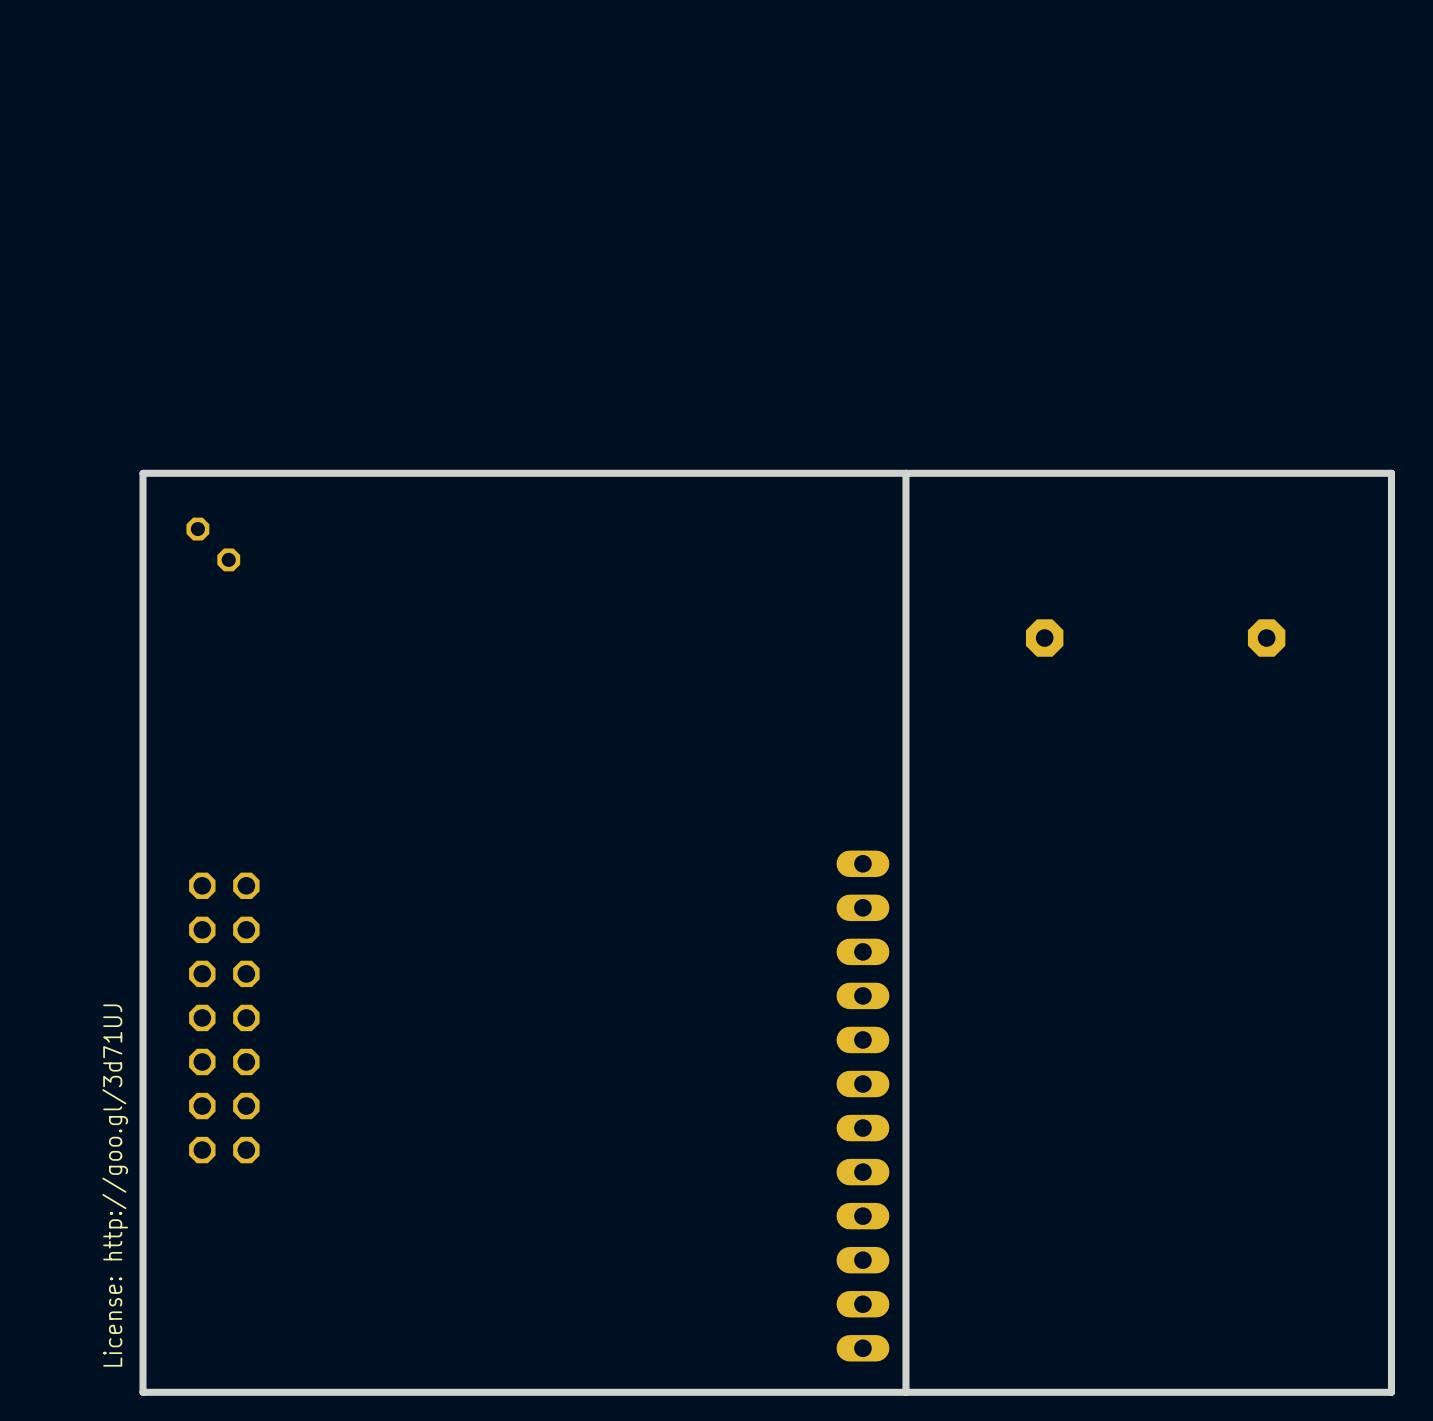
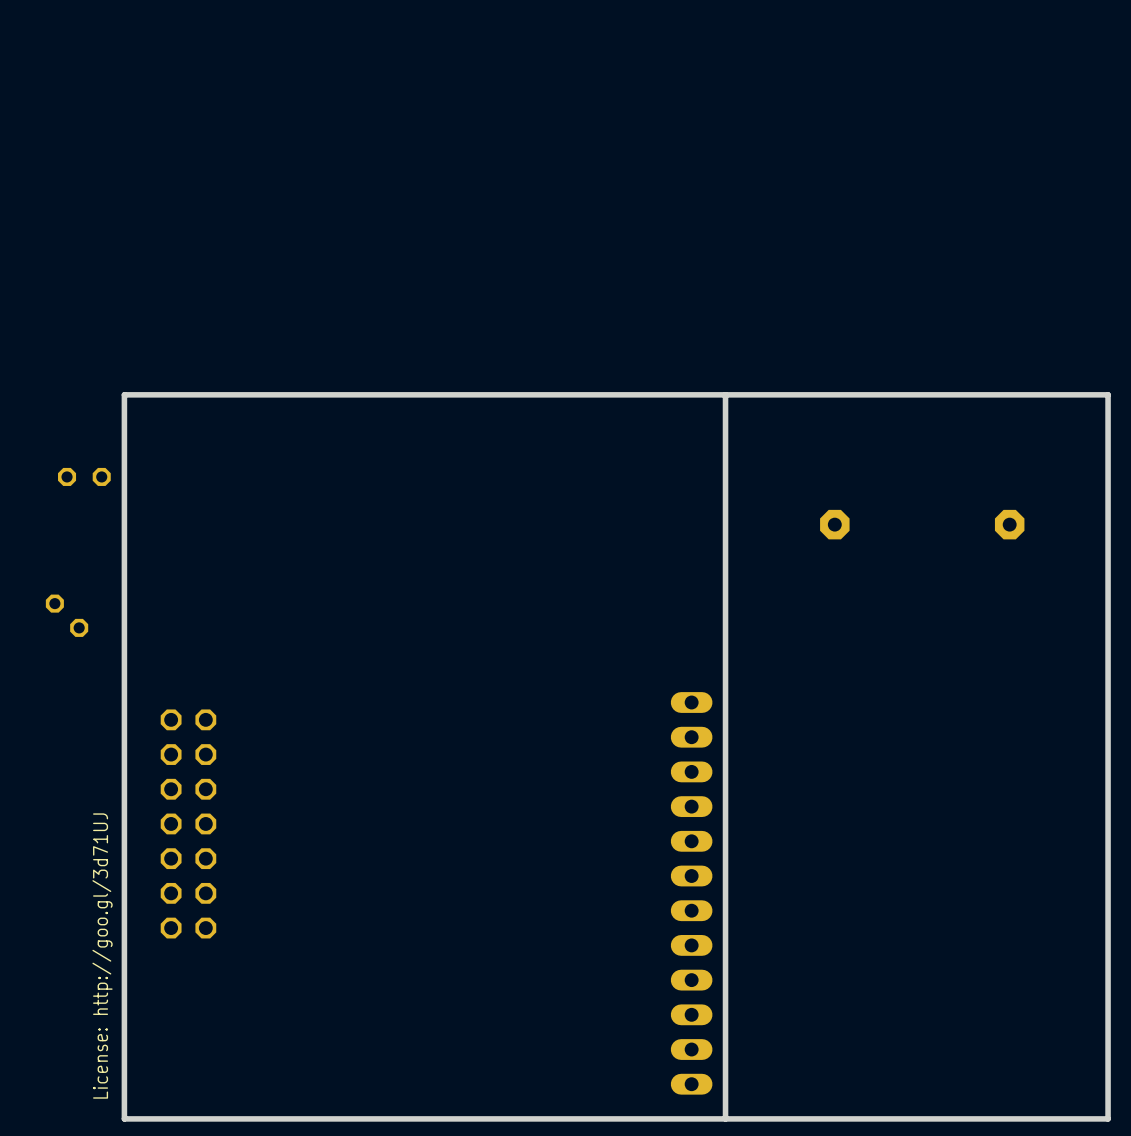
part position: (213, 544) -> (67, 615)
part: none -> (84, 476)

